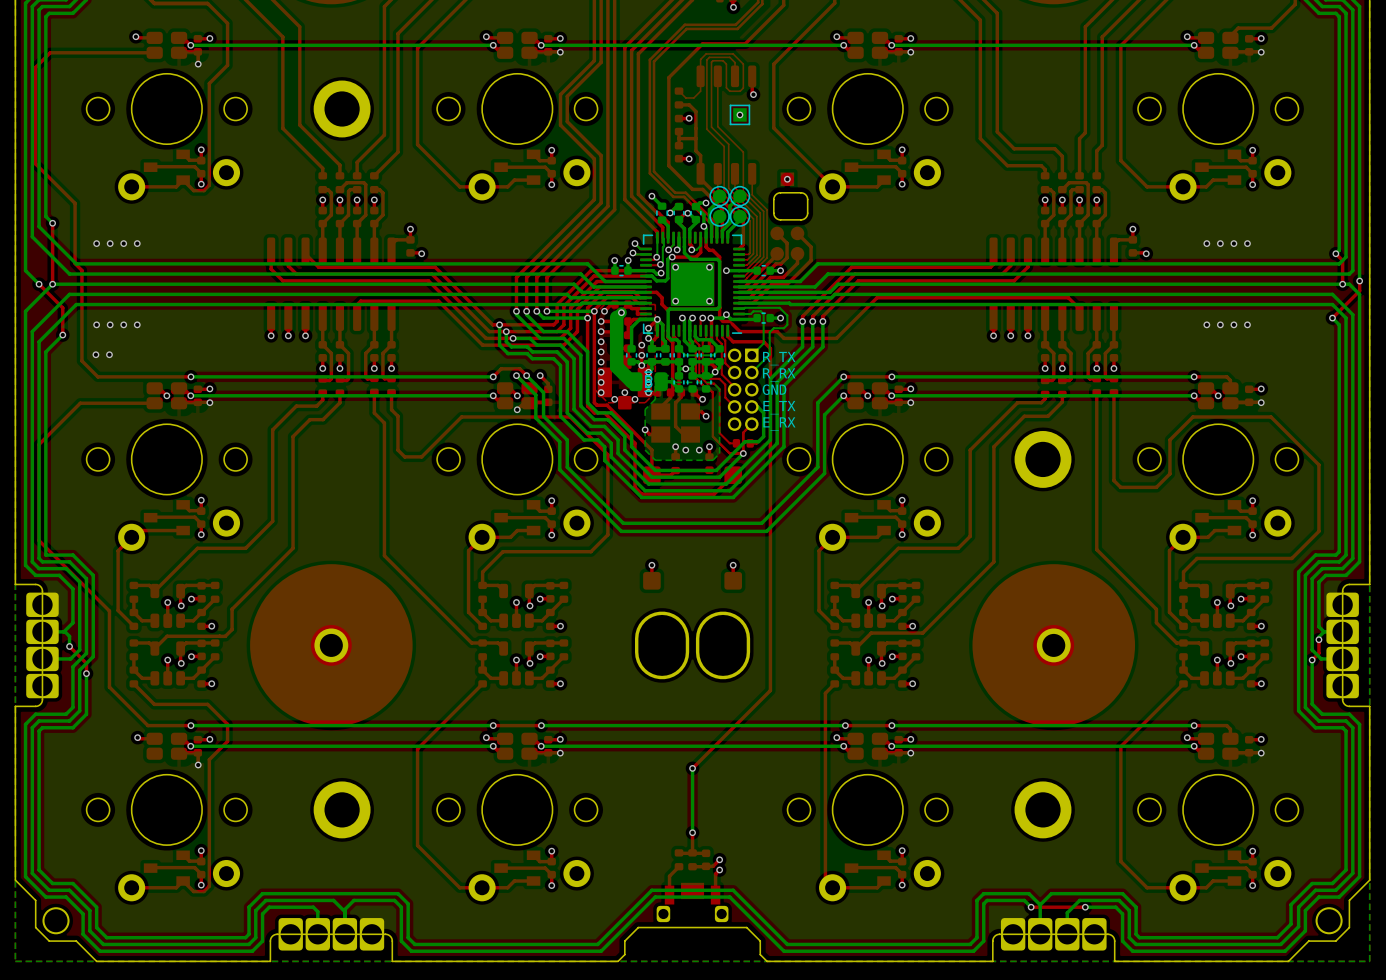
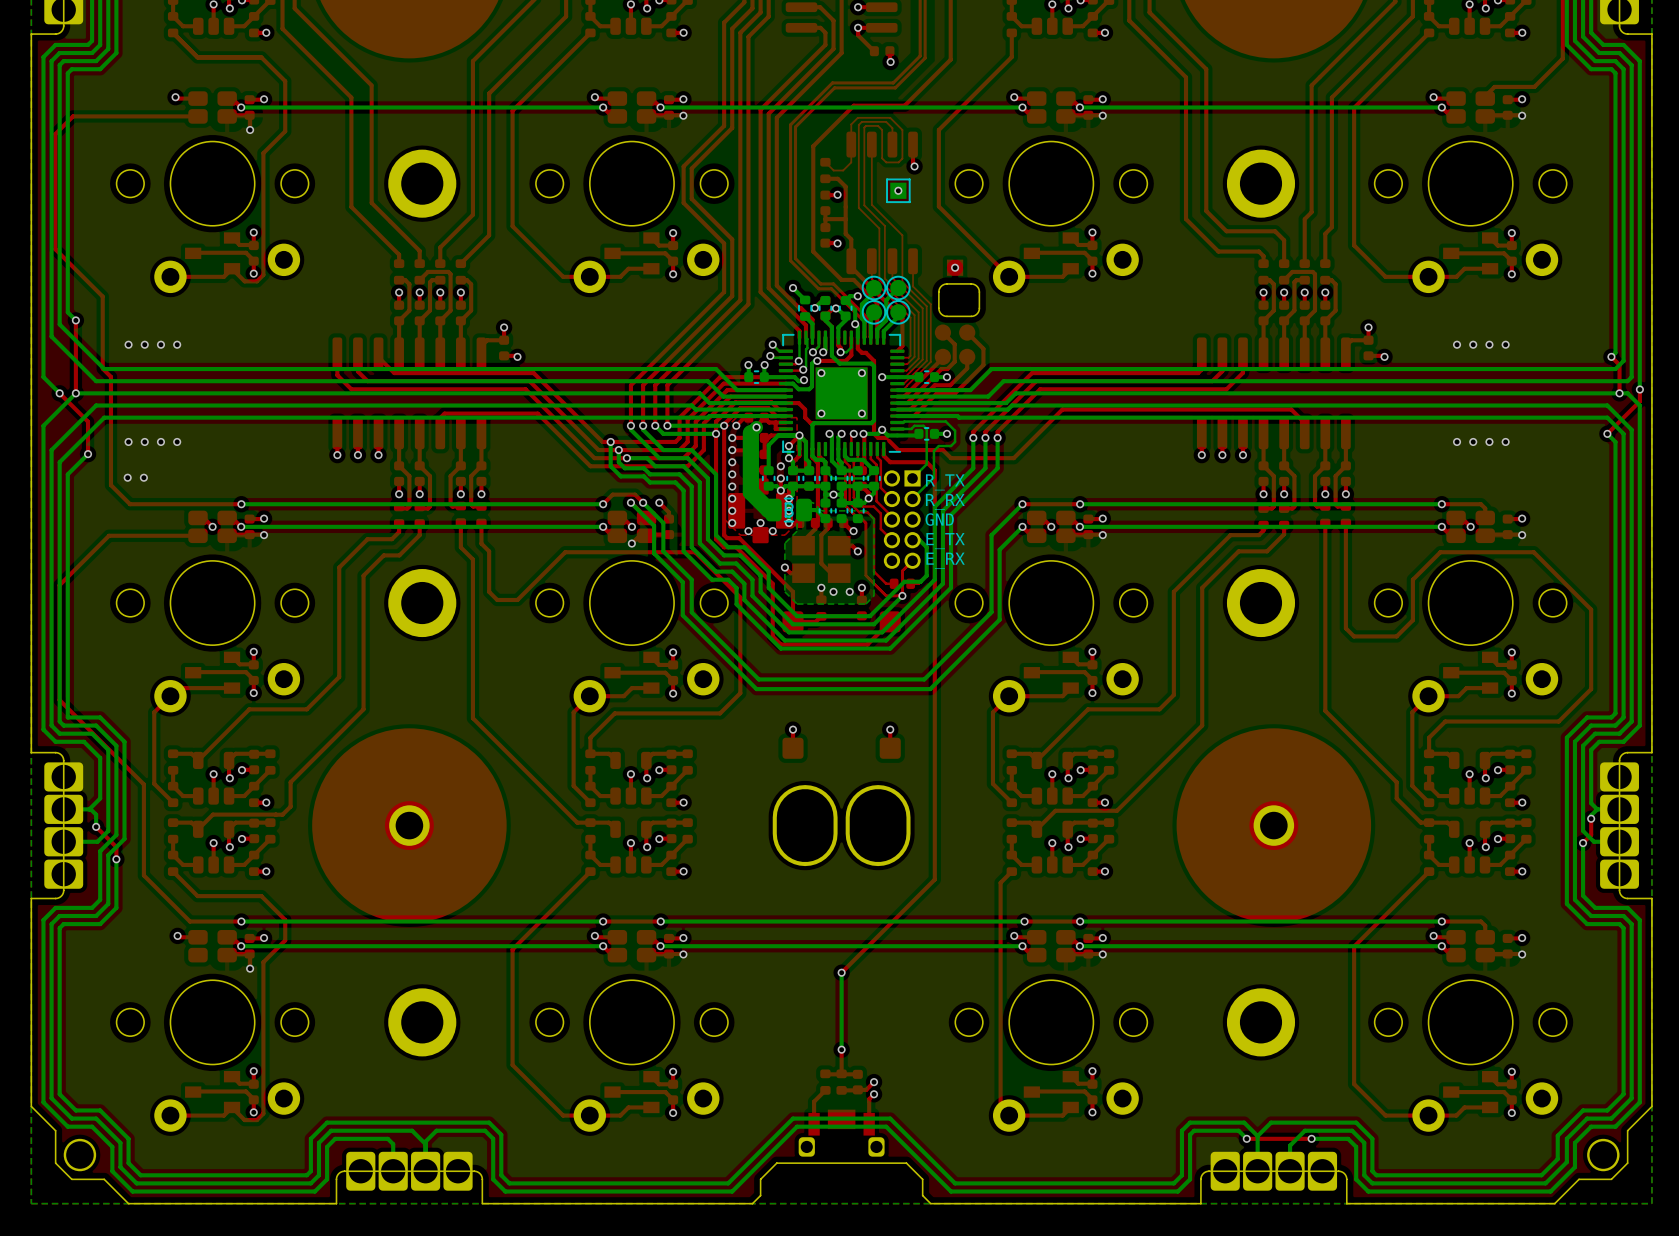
part: none -> (1260, 183)
part: none -> (422, 603)

